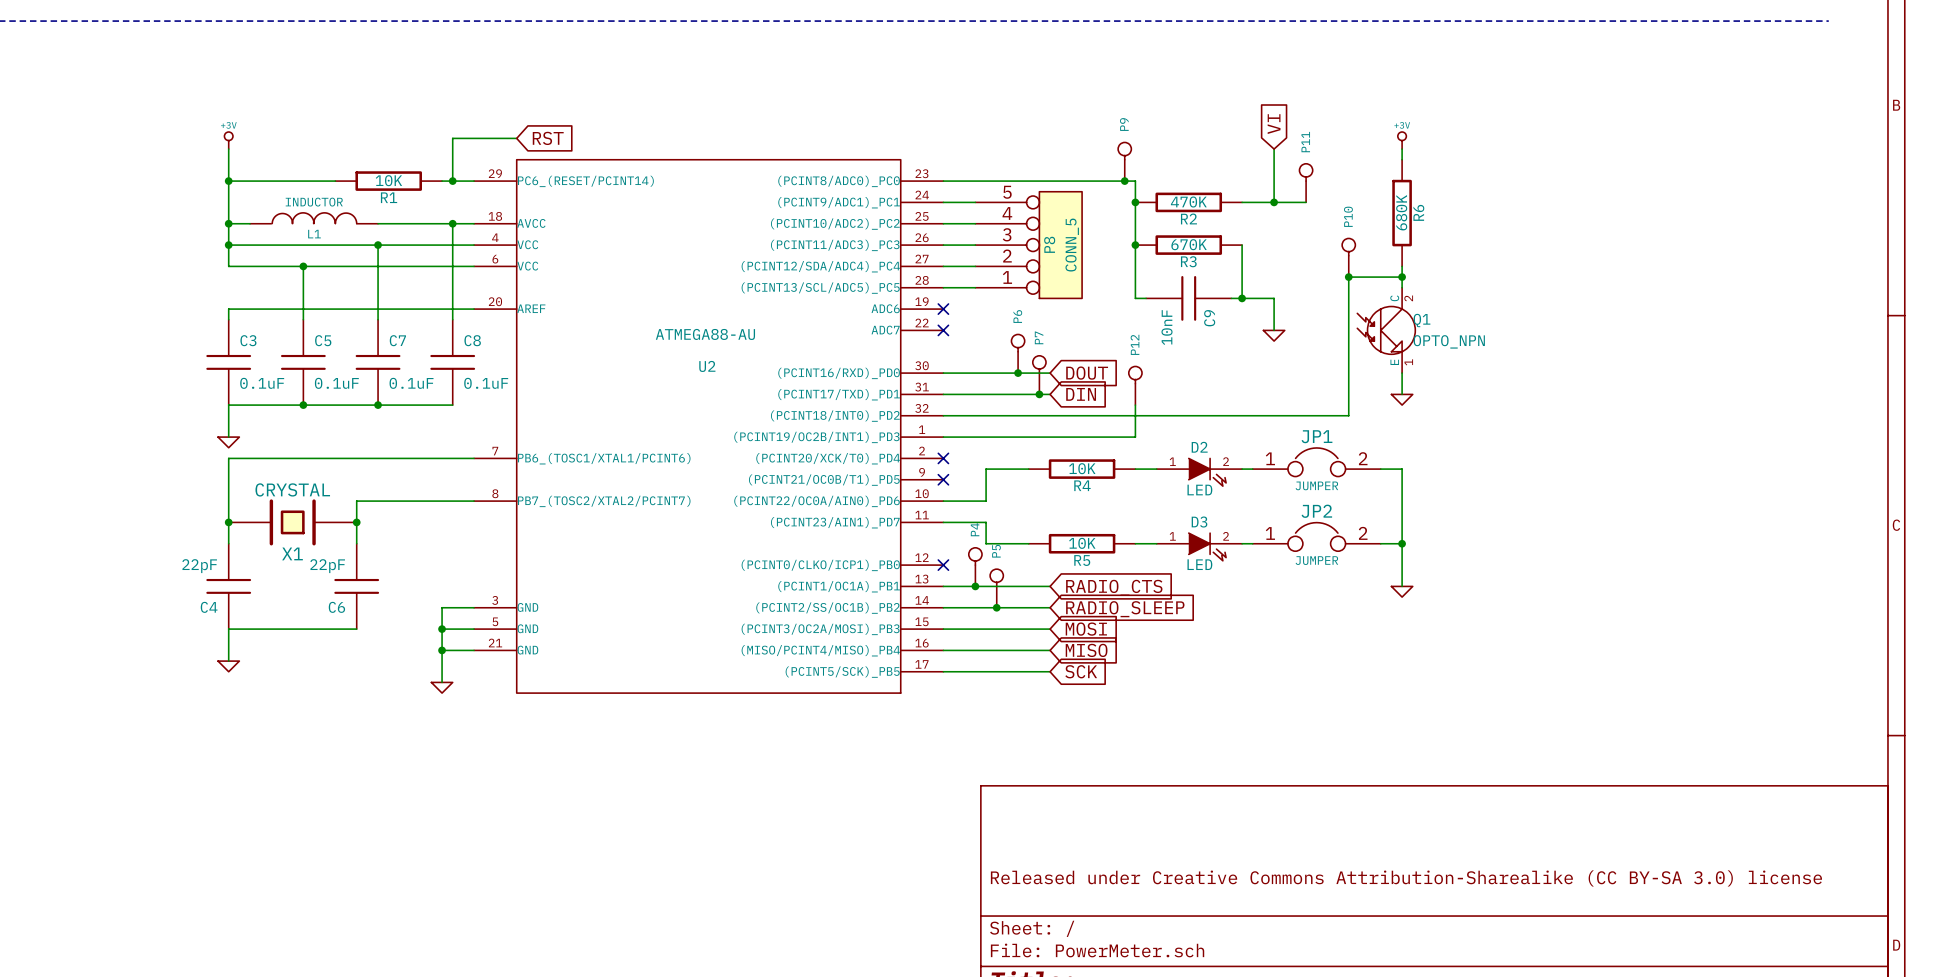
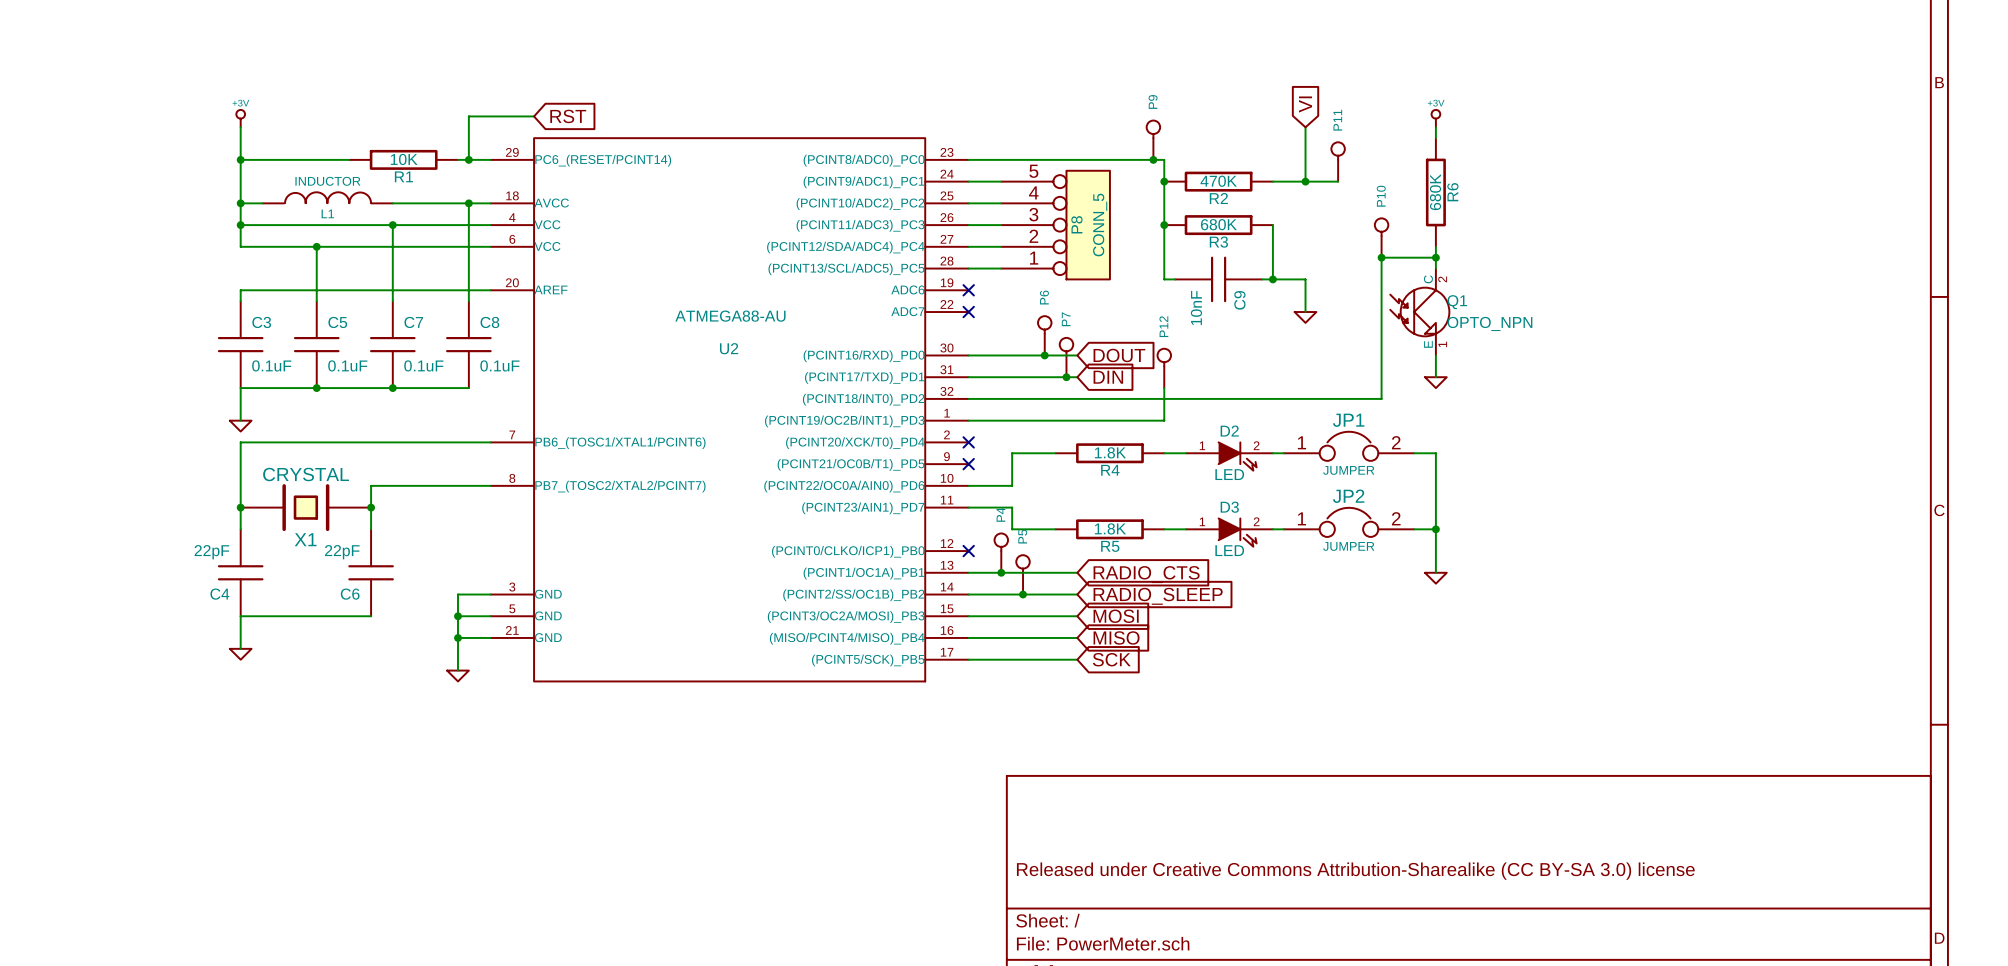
R3 value: 670K (1189, 244) -> 680K (1218, 224)
R4 value: 10K (1082, 468) -> 1.8K (1110, 452)
R5 value: 10K (1082, 543) -> 1.8K (1110, 528)

